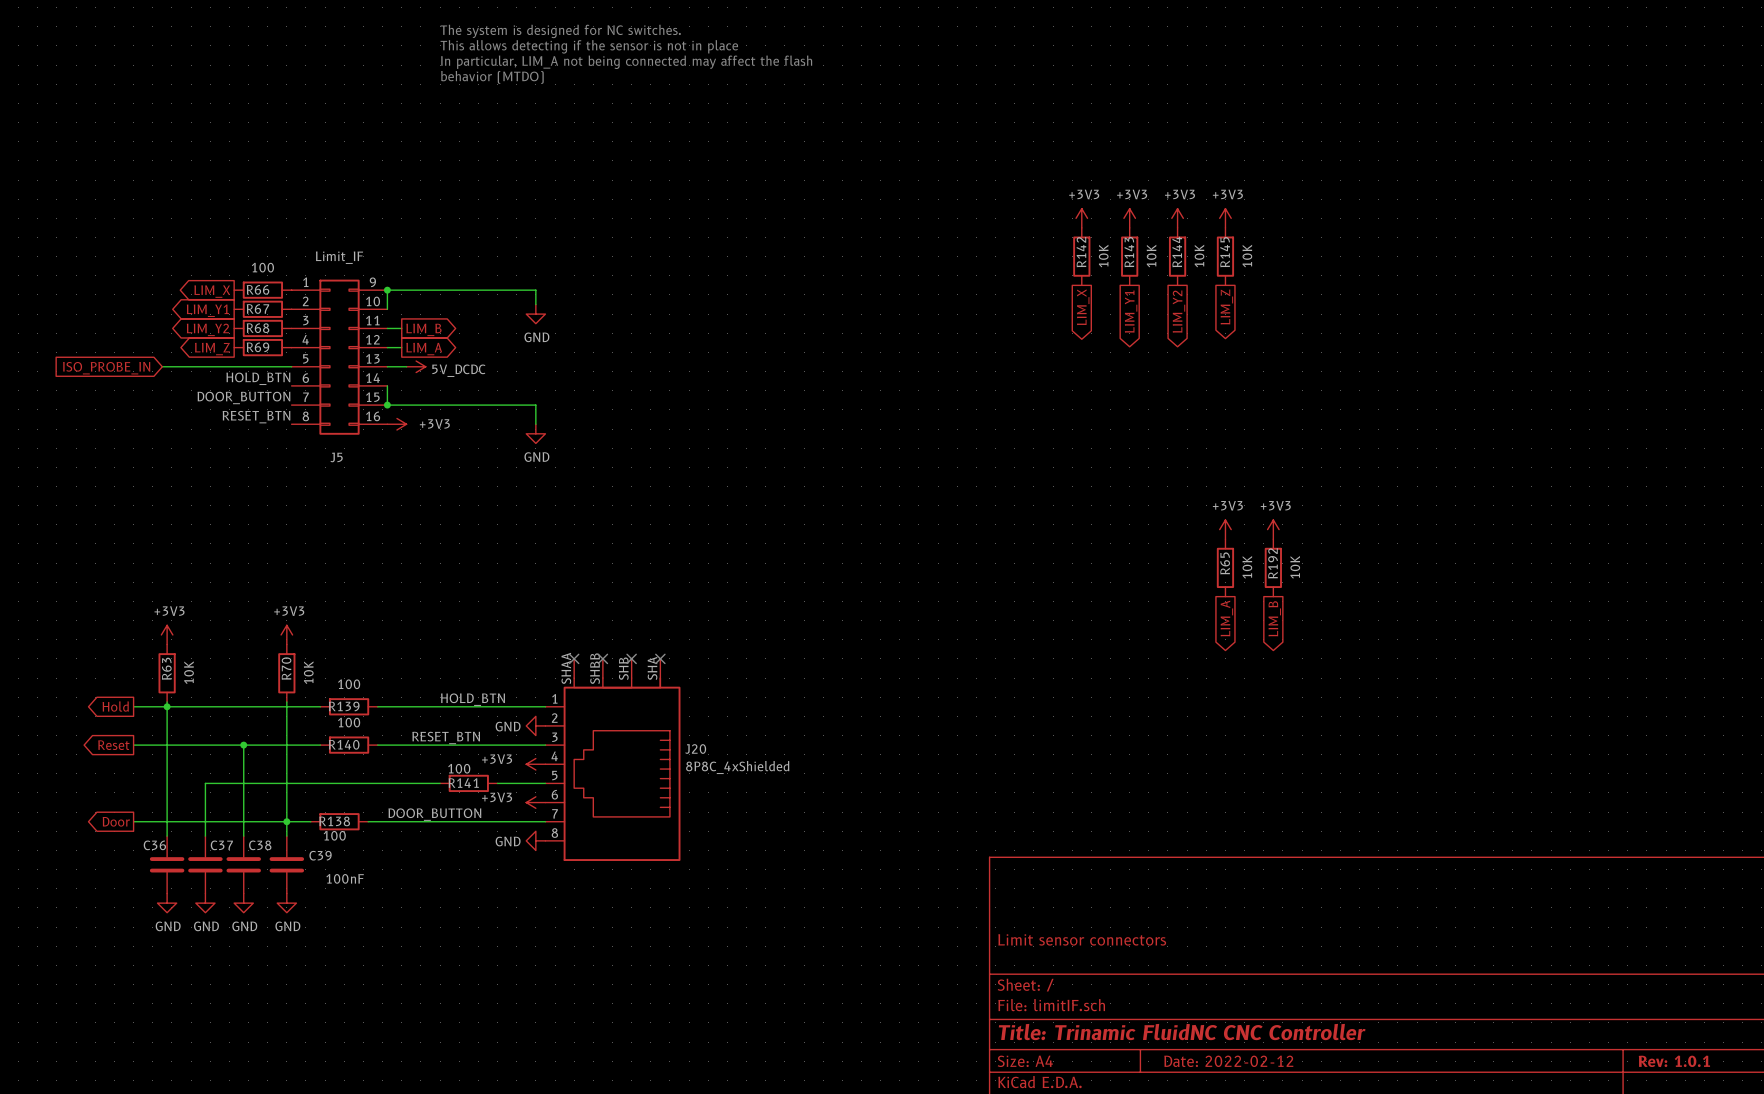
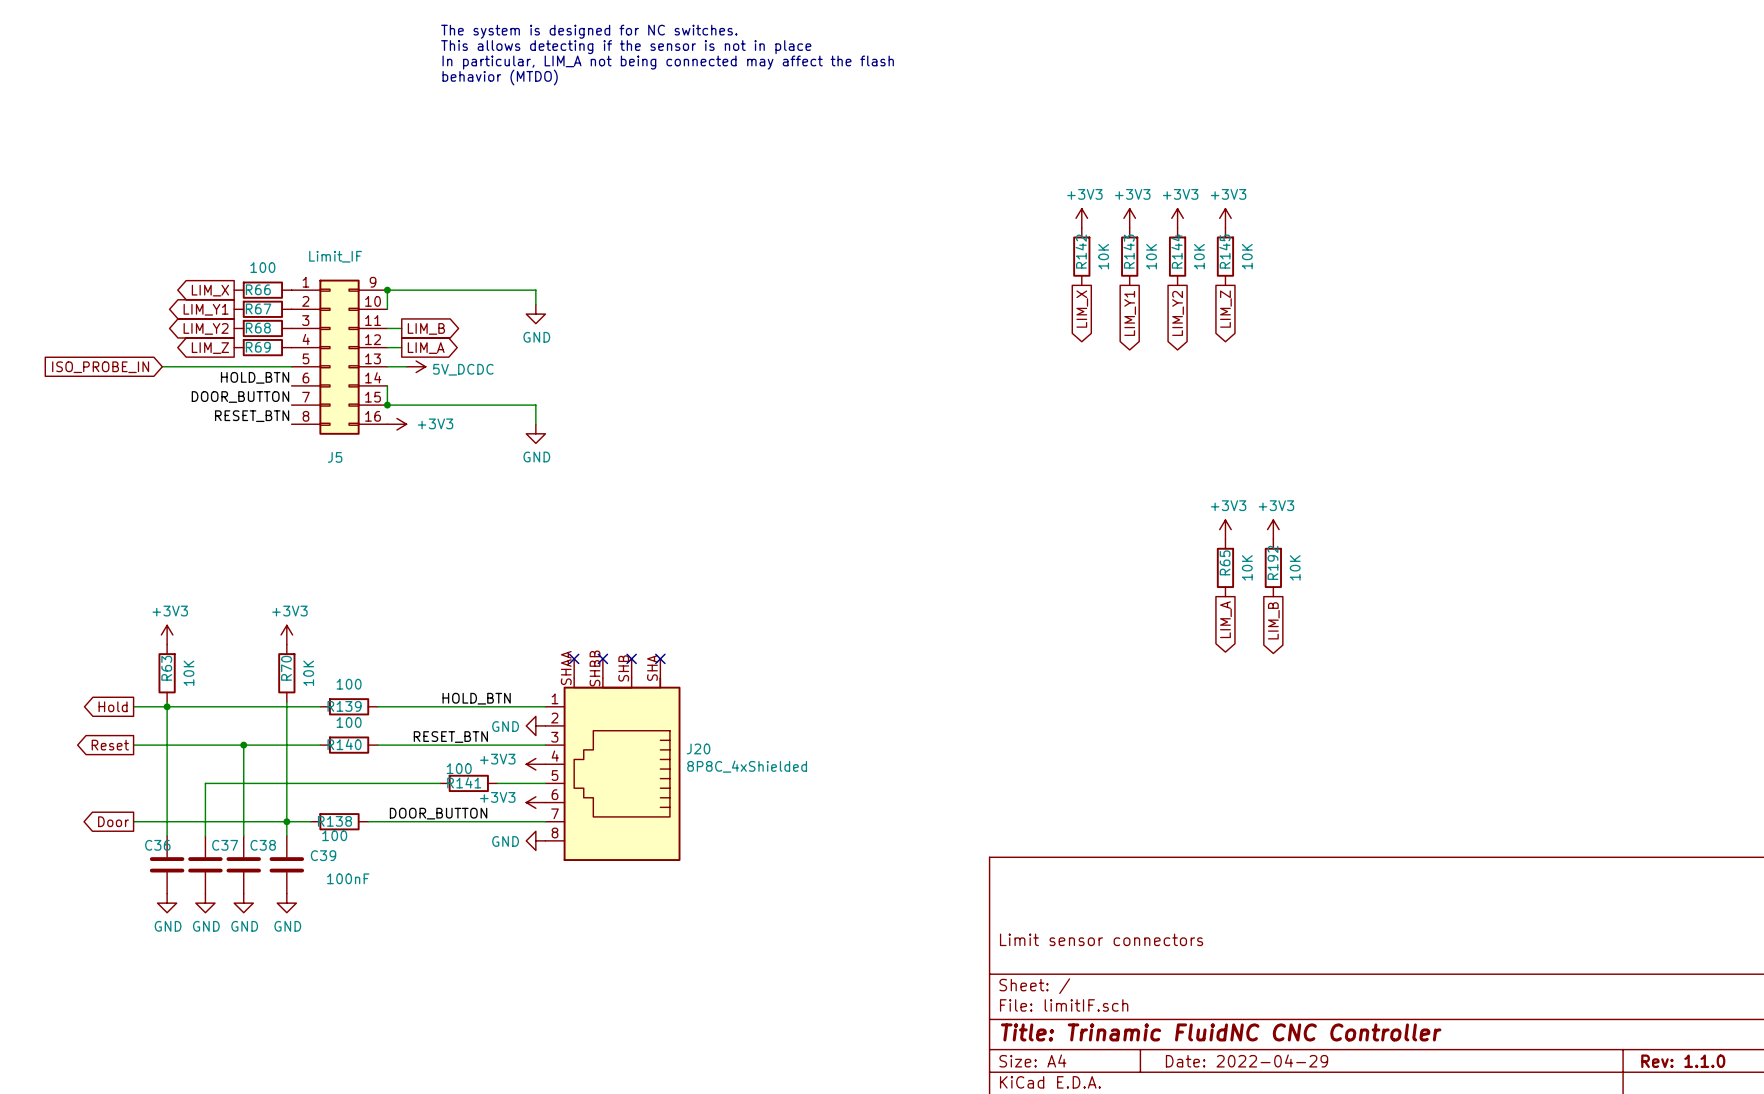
title block: Date: 2022-02-12 (1228, 1061) -> Date: 2022-04-29 (1247, 1060)
title block: Rev: 1.0.1 (1674, 1061) -> Rev: 1.1.0 (1683, 1061)

